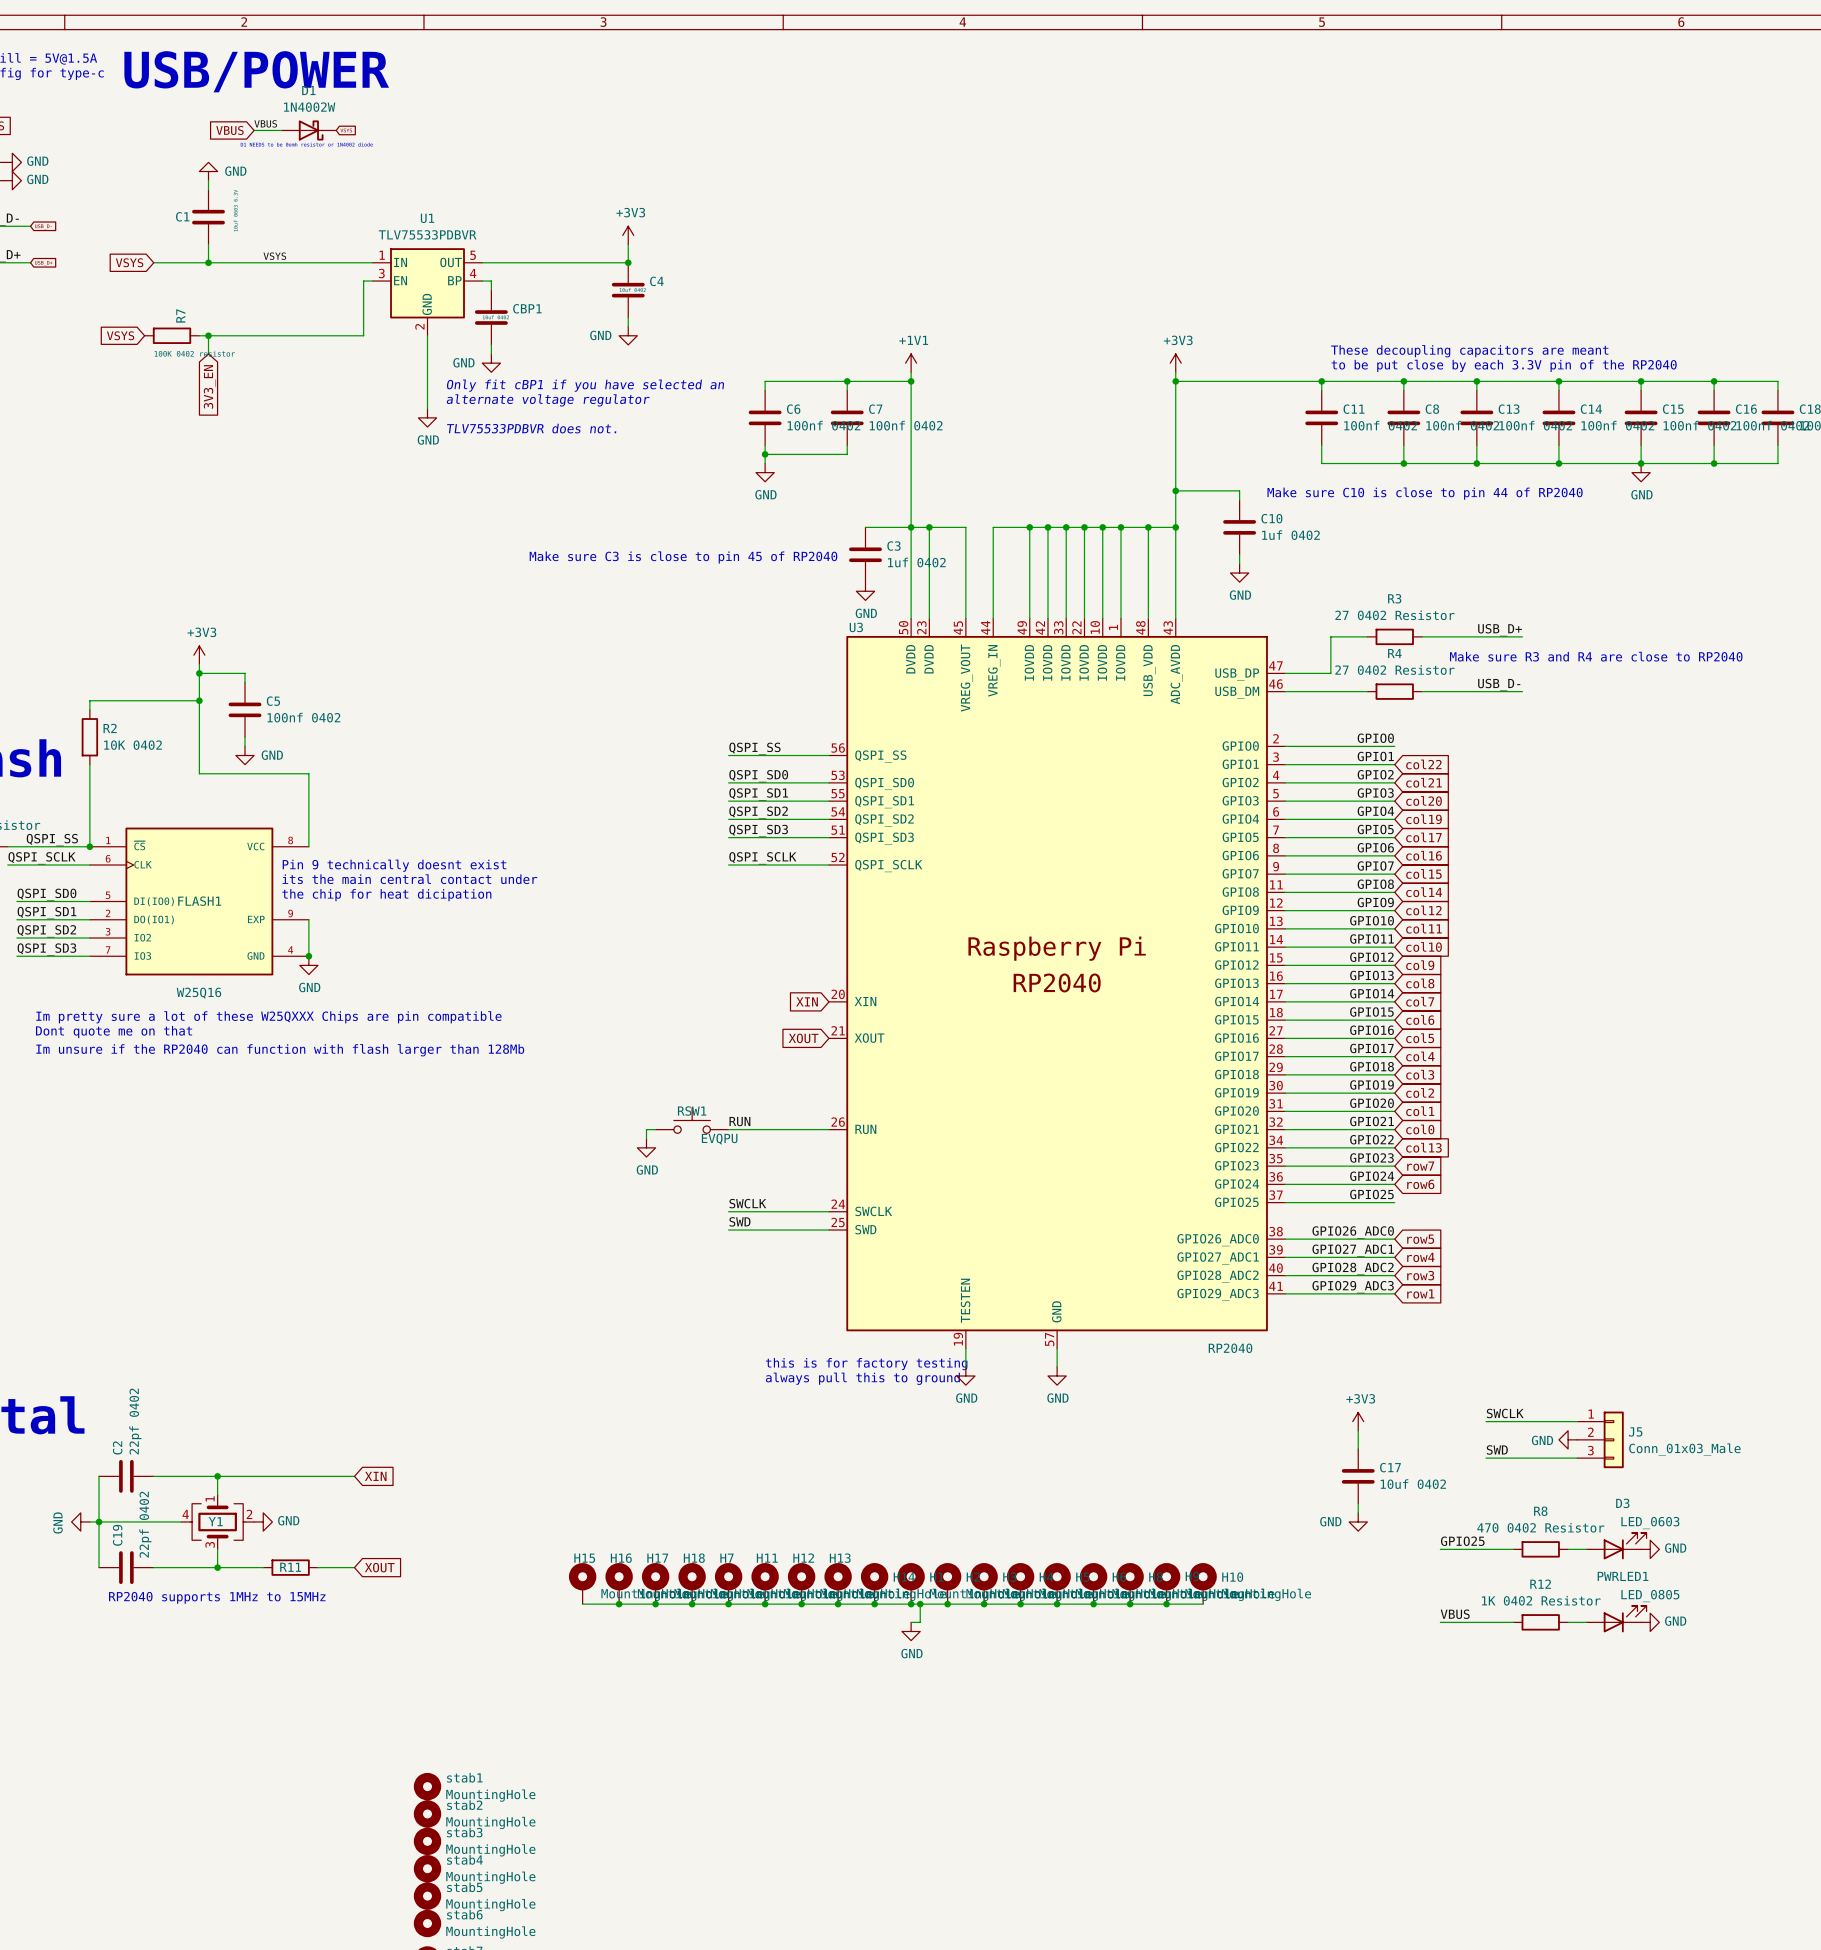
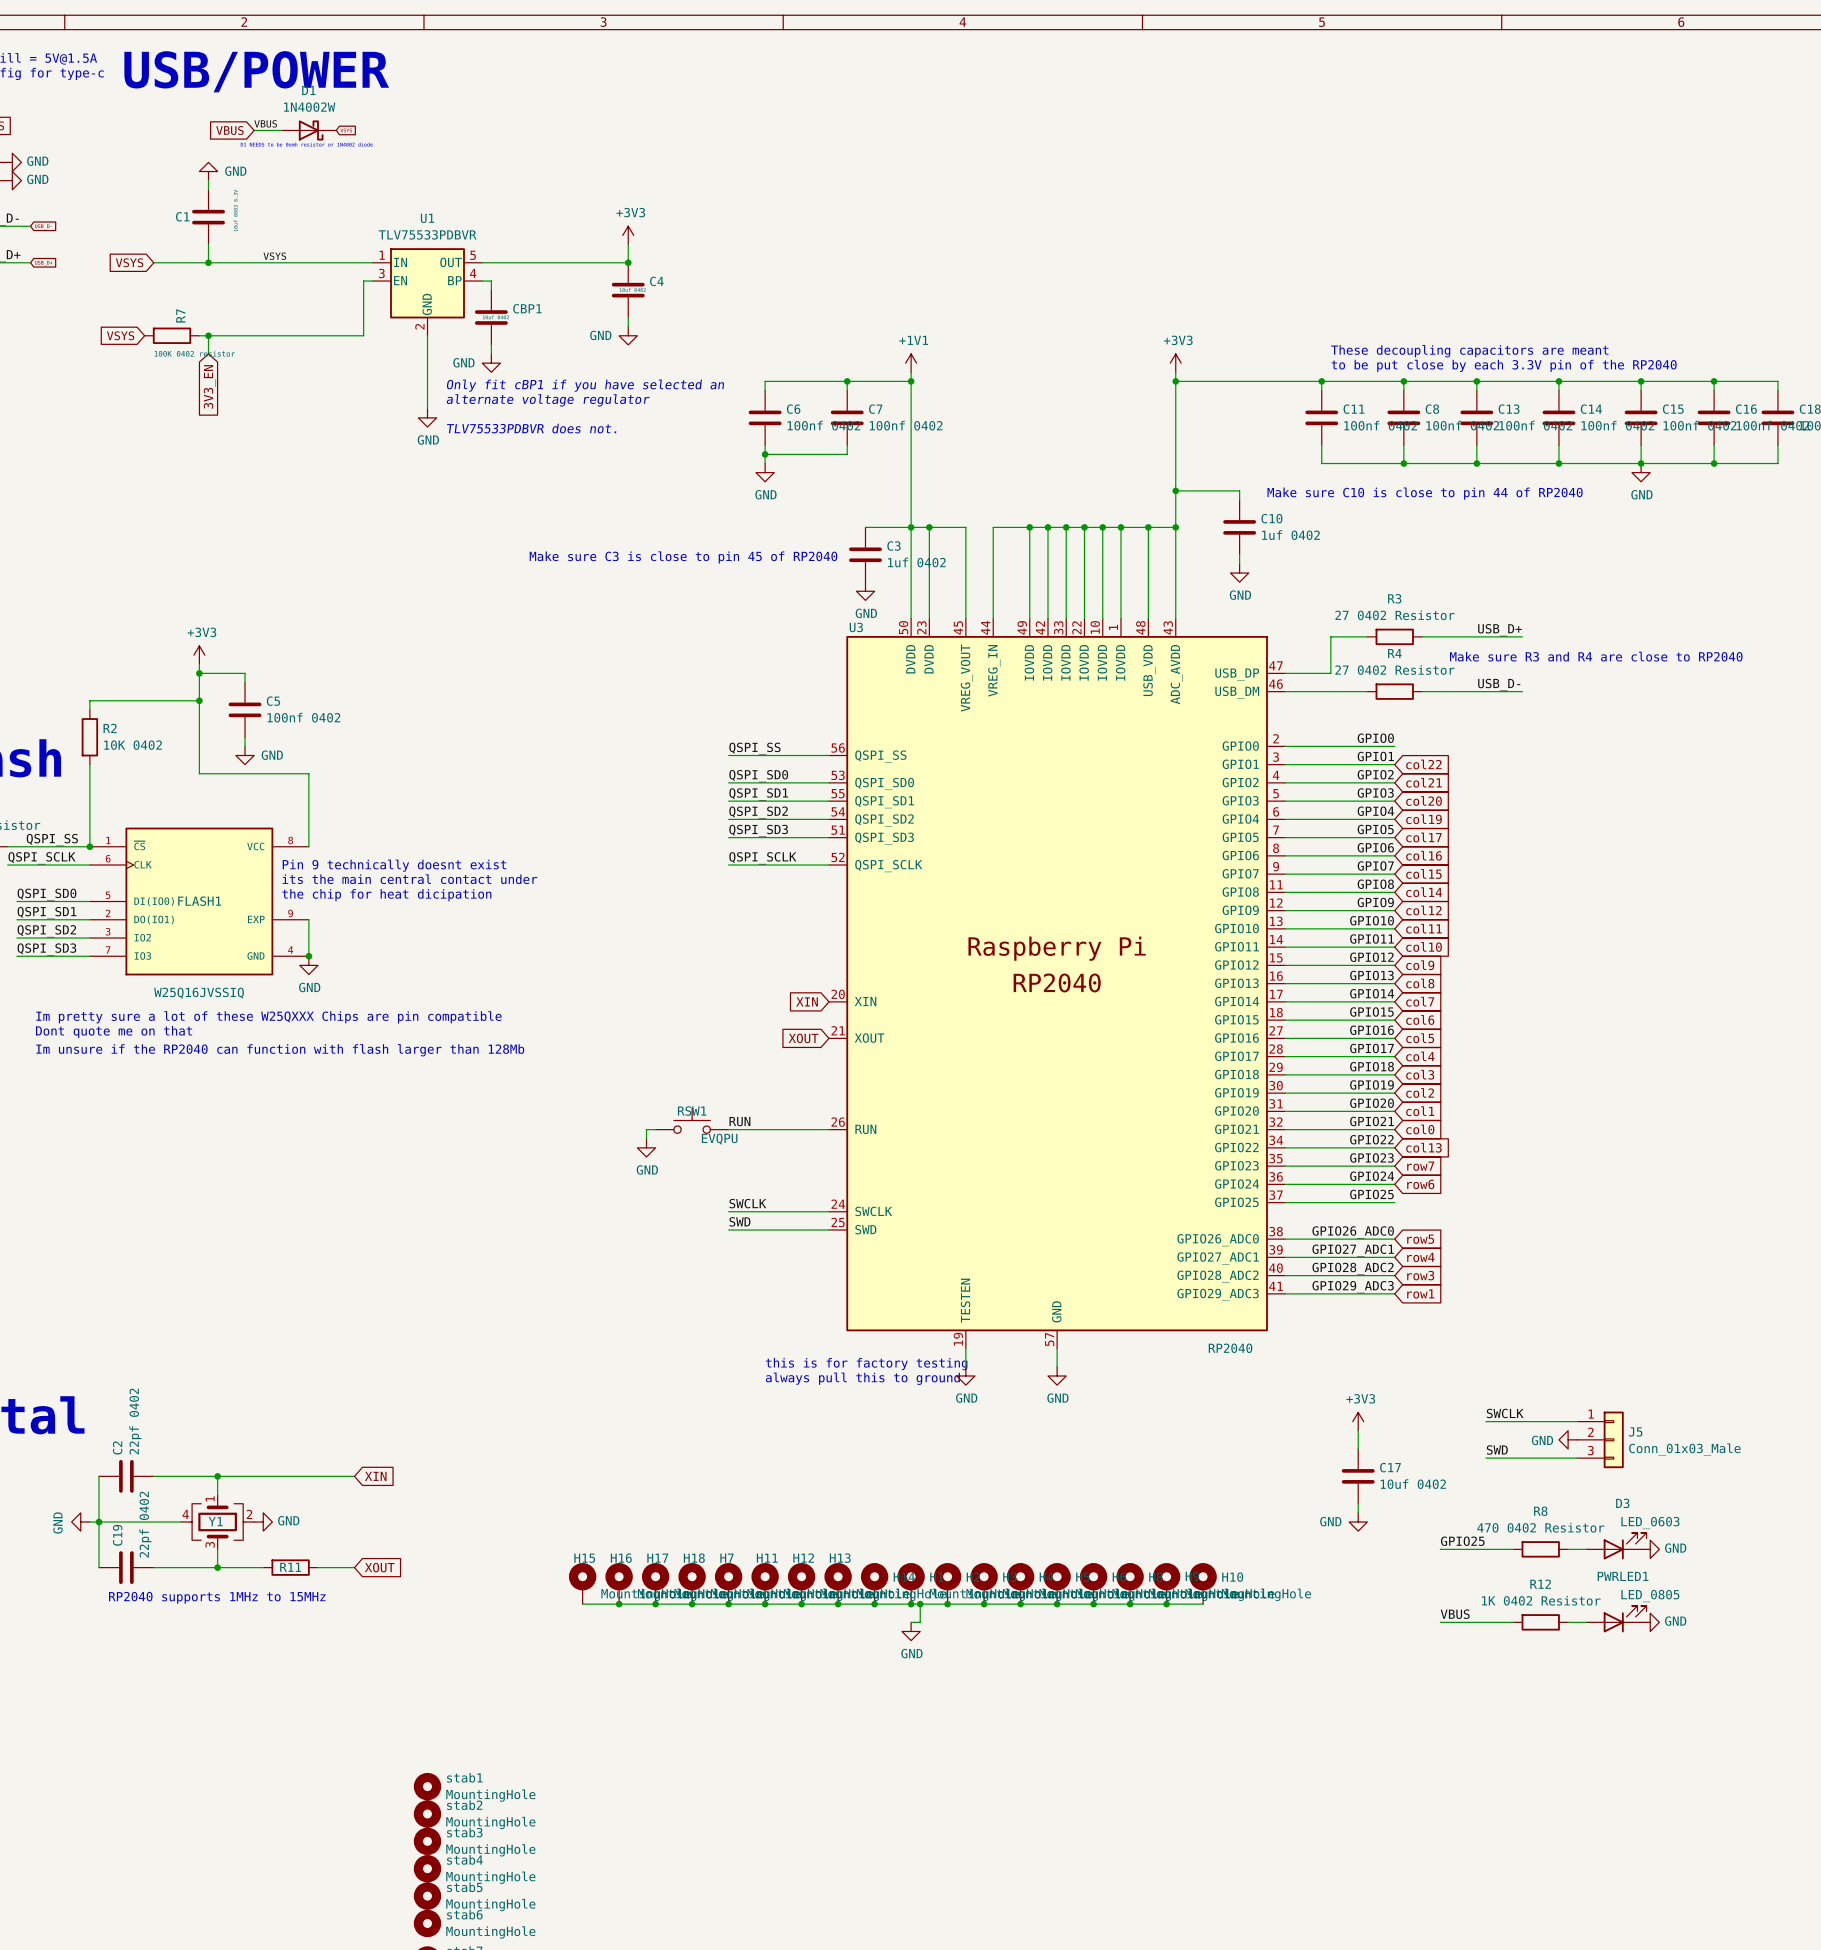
FLASH1 value: W25Q16 (198, 993) -> W25Q16JVSSIQ (199, 993)

